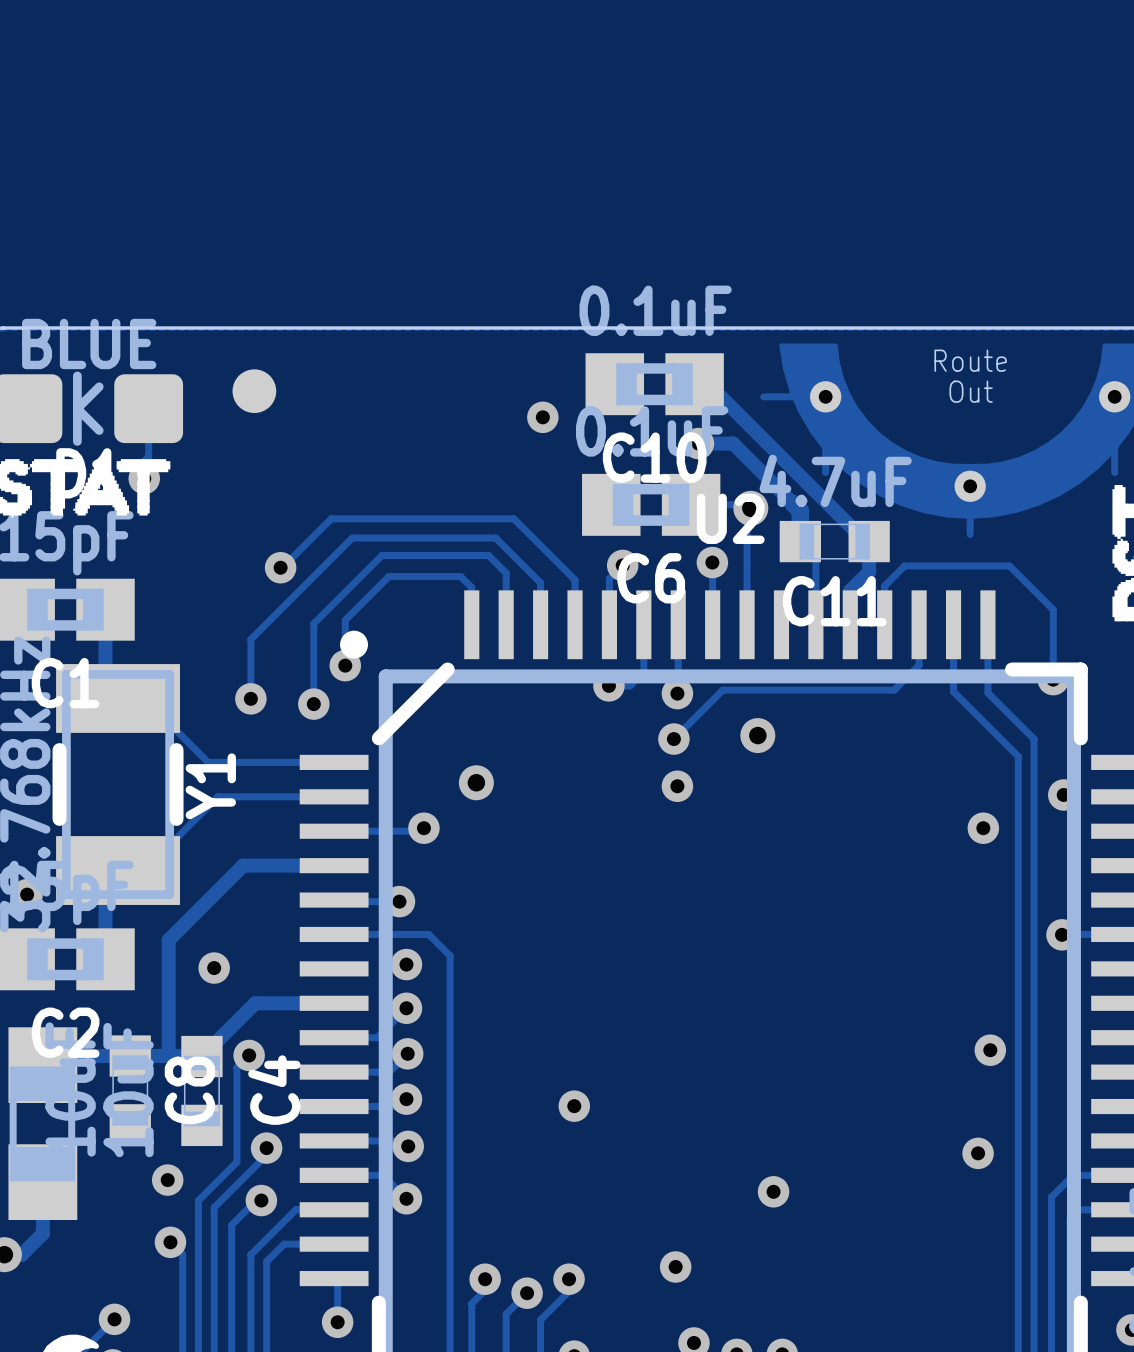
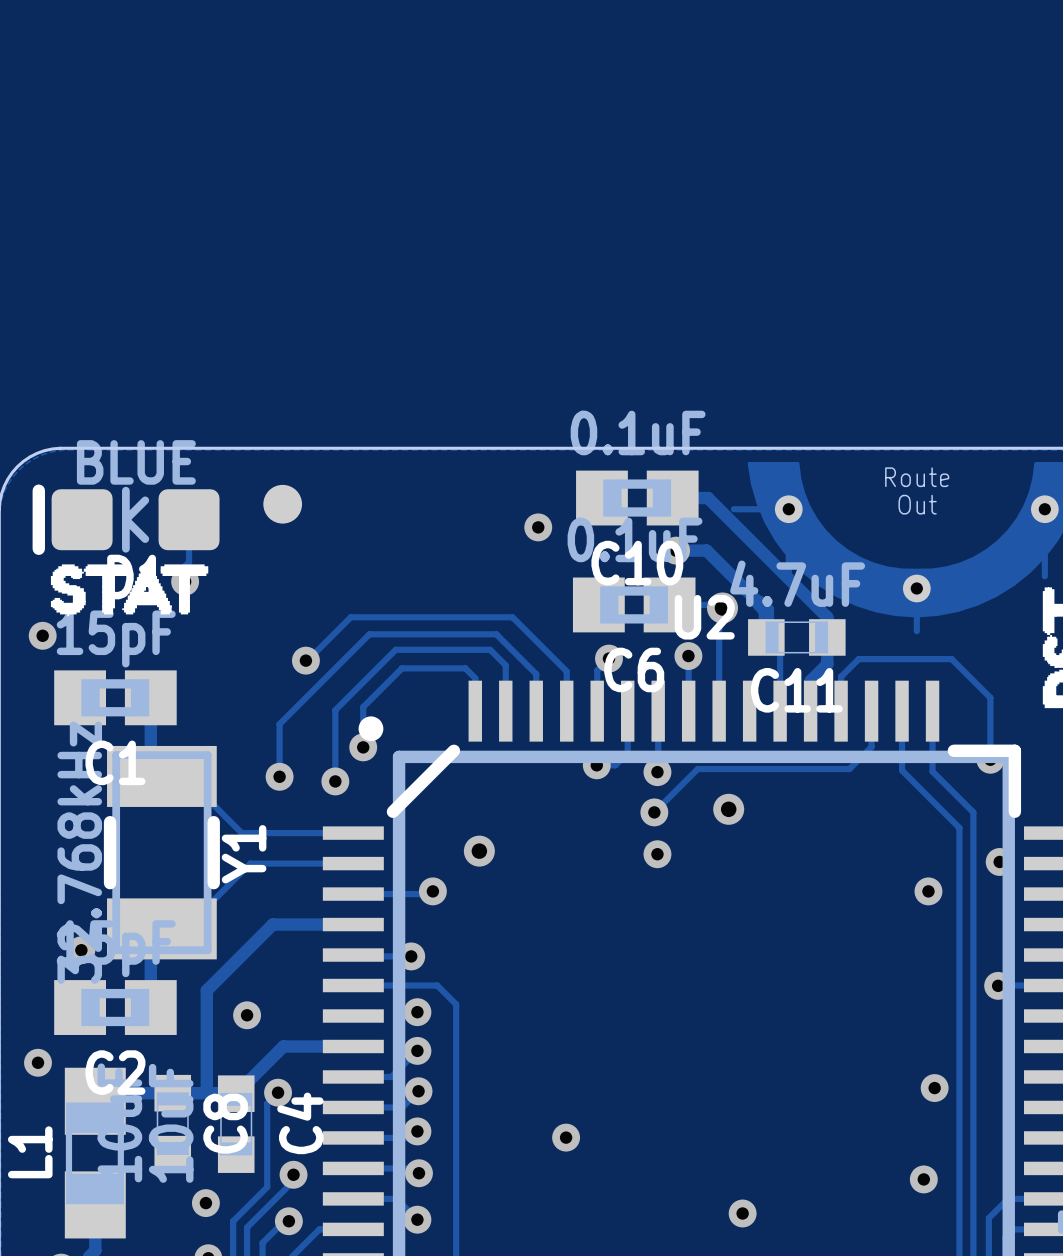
track: (708, 384) (865, 541) (869, 541) -> (684, 498) (708, 498) (827, 617) (827, 637)

